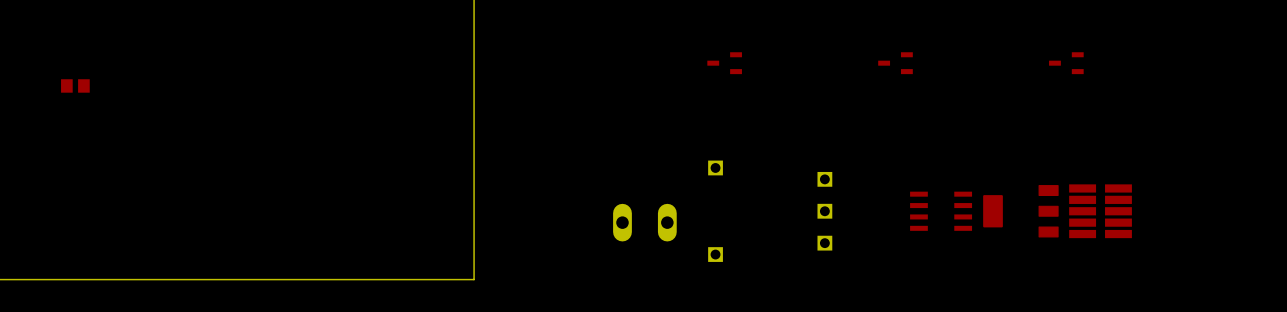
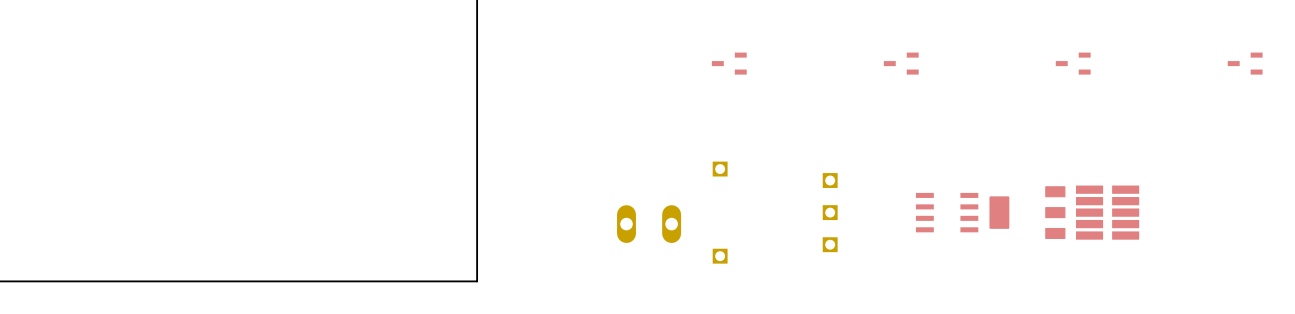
part: none -> (1245, 63)
part: (75, 85) -> none

